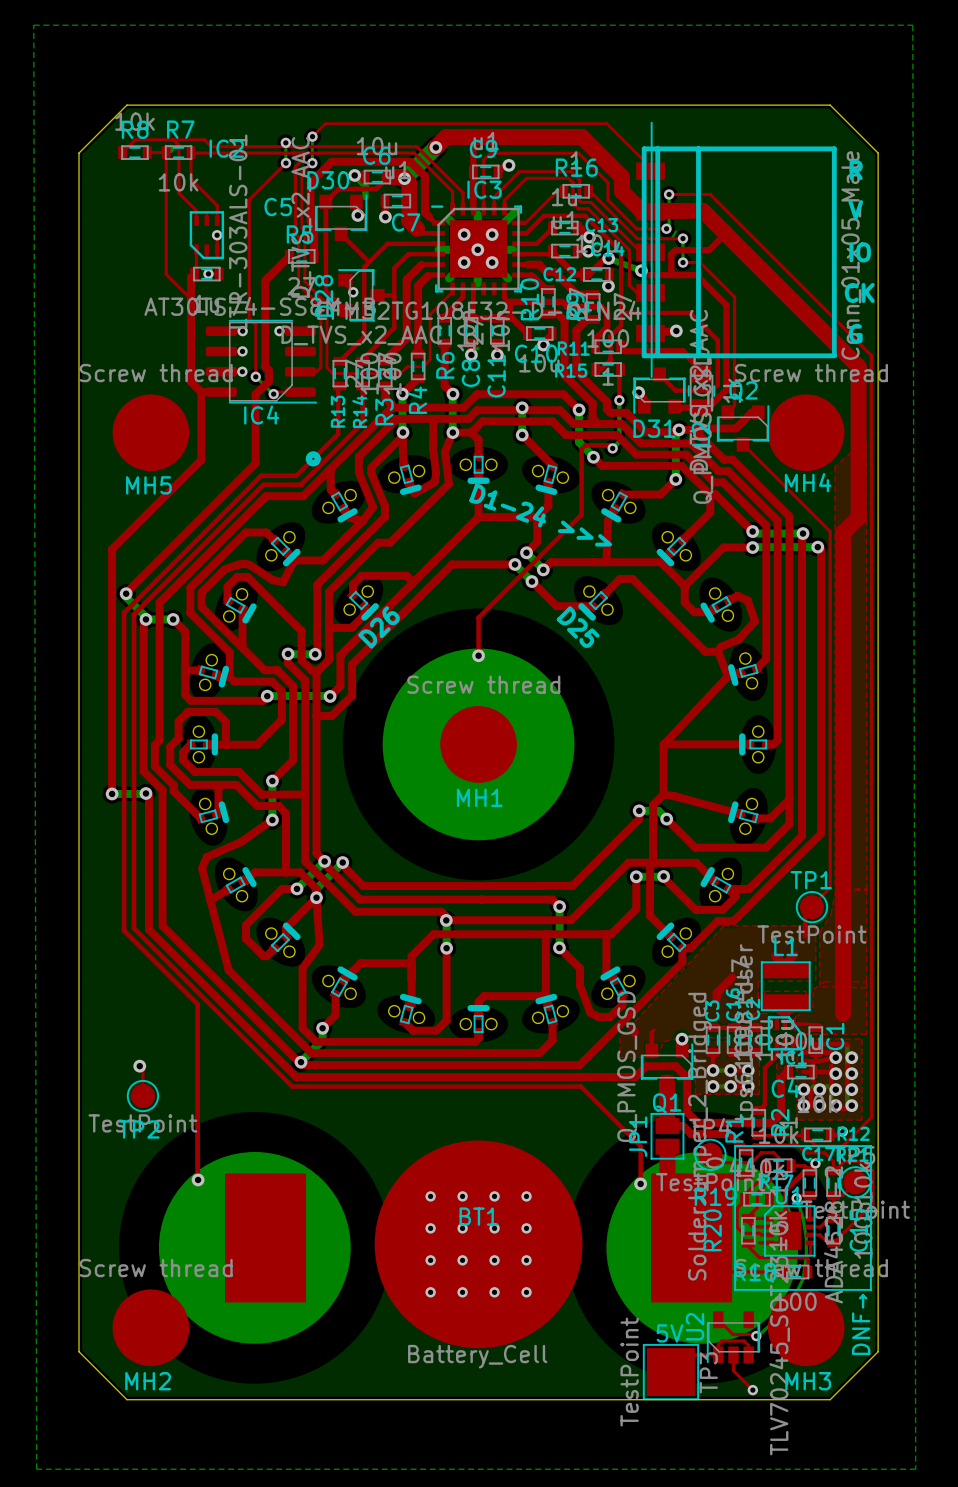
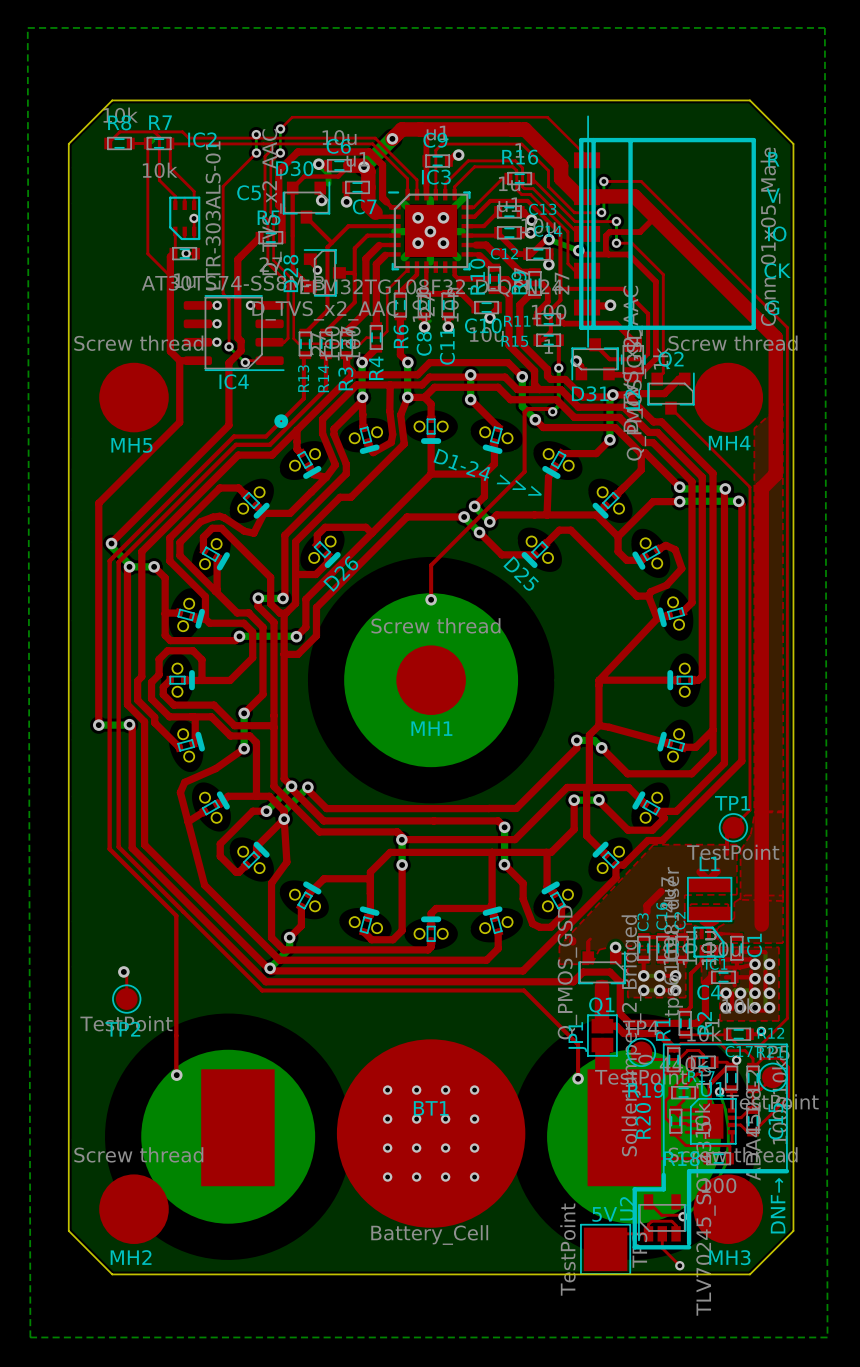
line: (870, 1285) (870, 1289) (735, 1289) -> (786, 1171) (689, 1171) (689, 1247) (634, 1247) (634, 1189) (663, 1189) (663, 1174)

